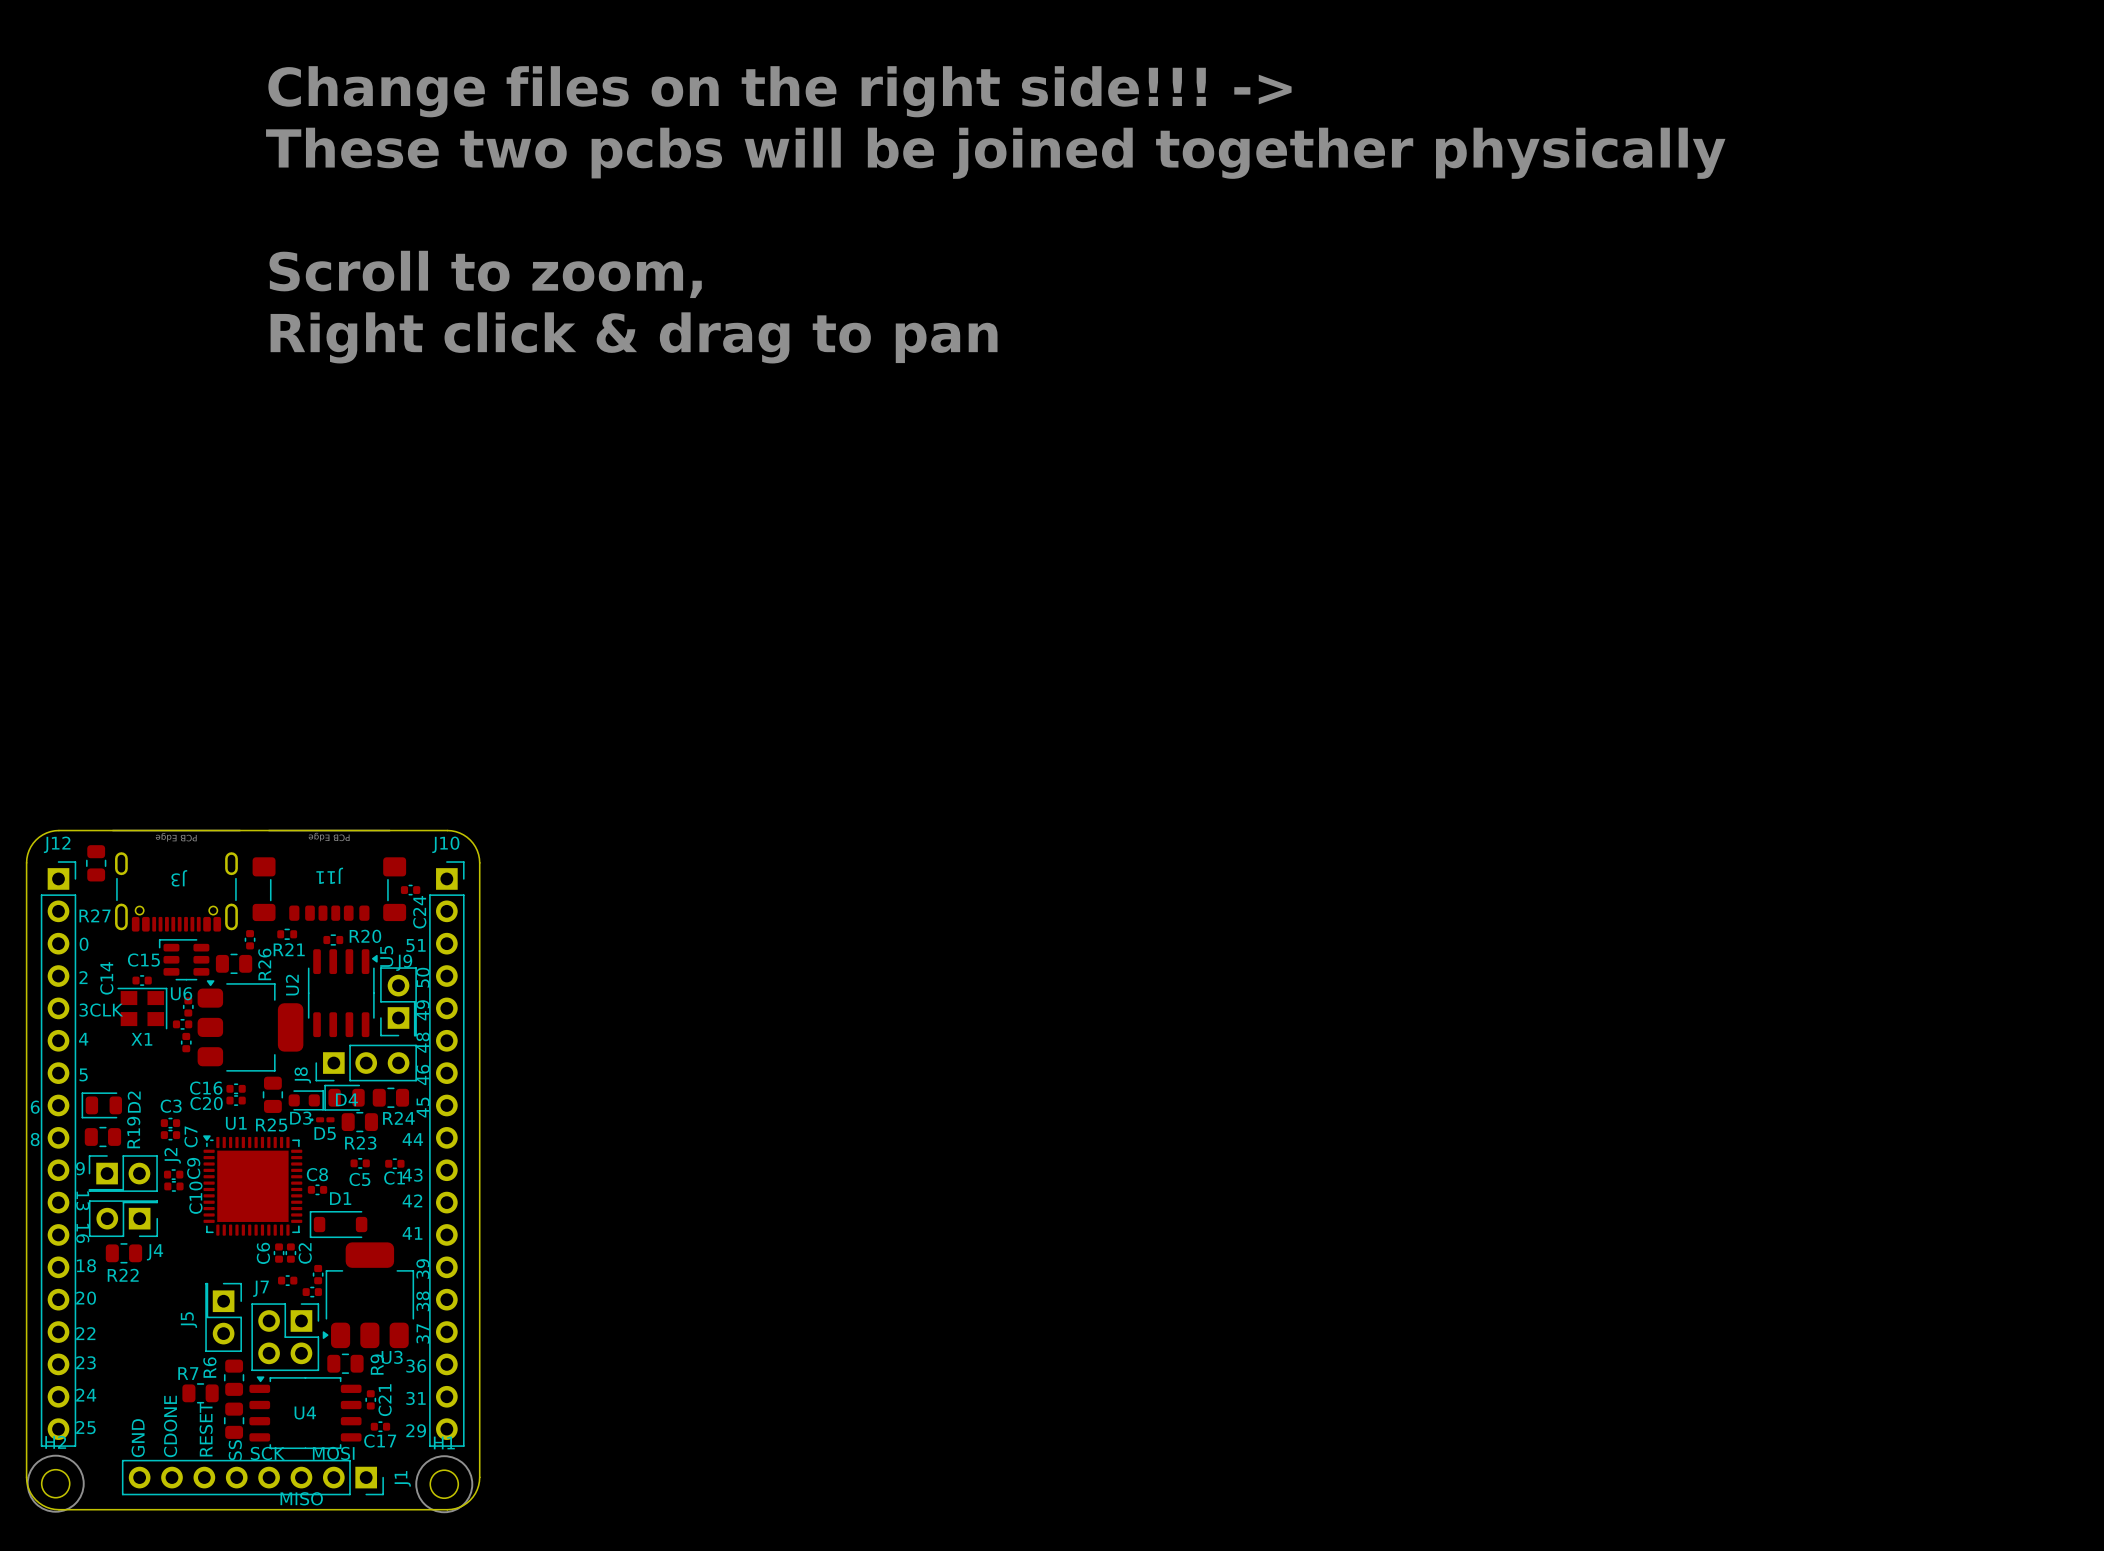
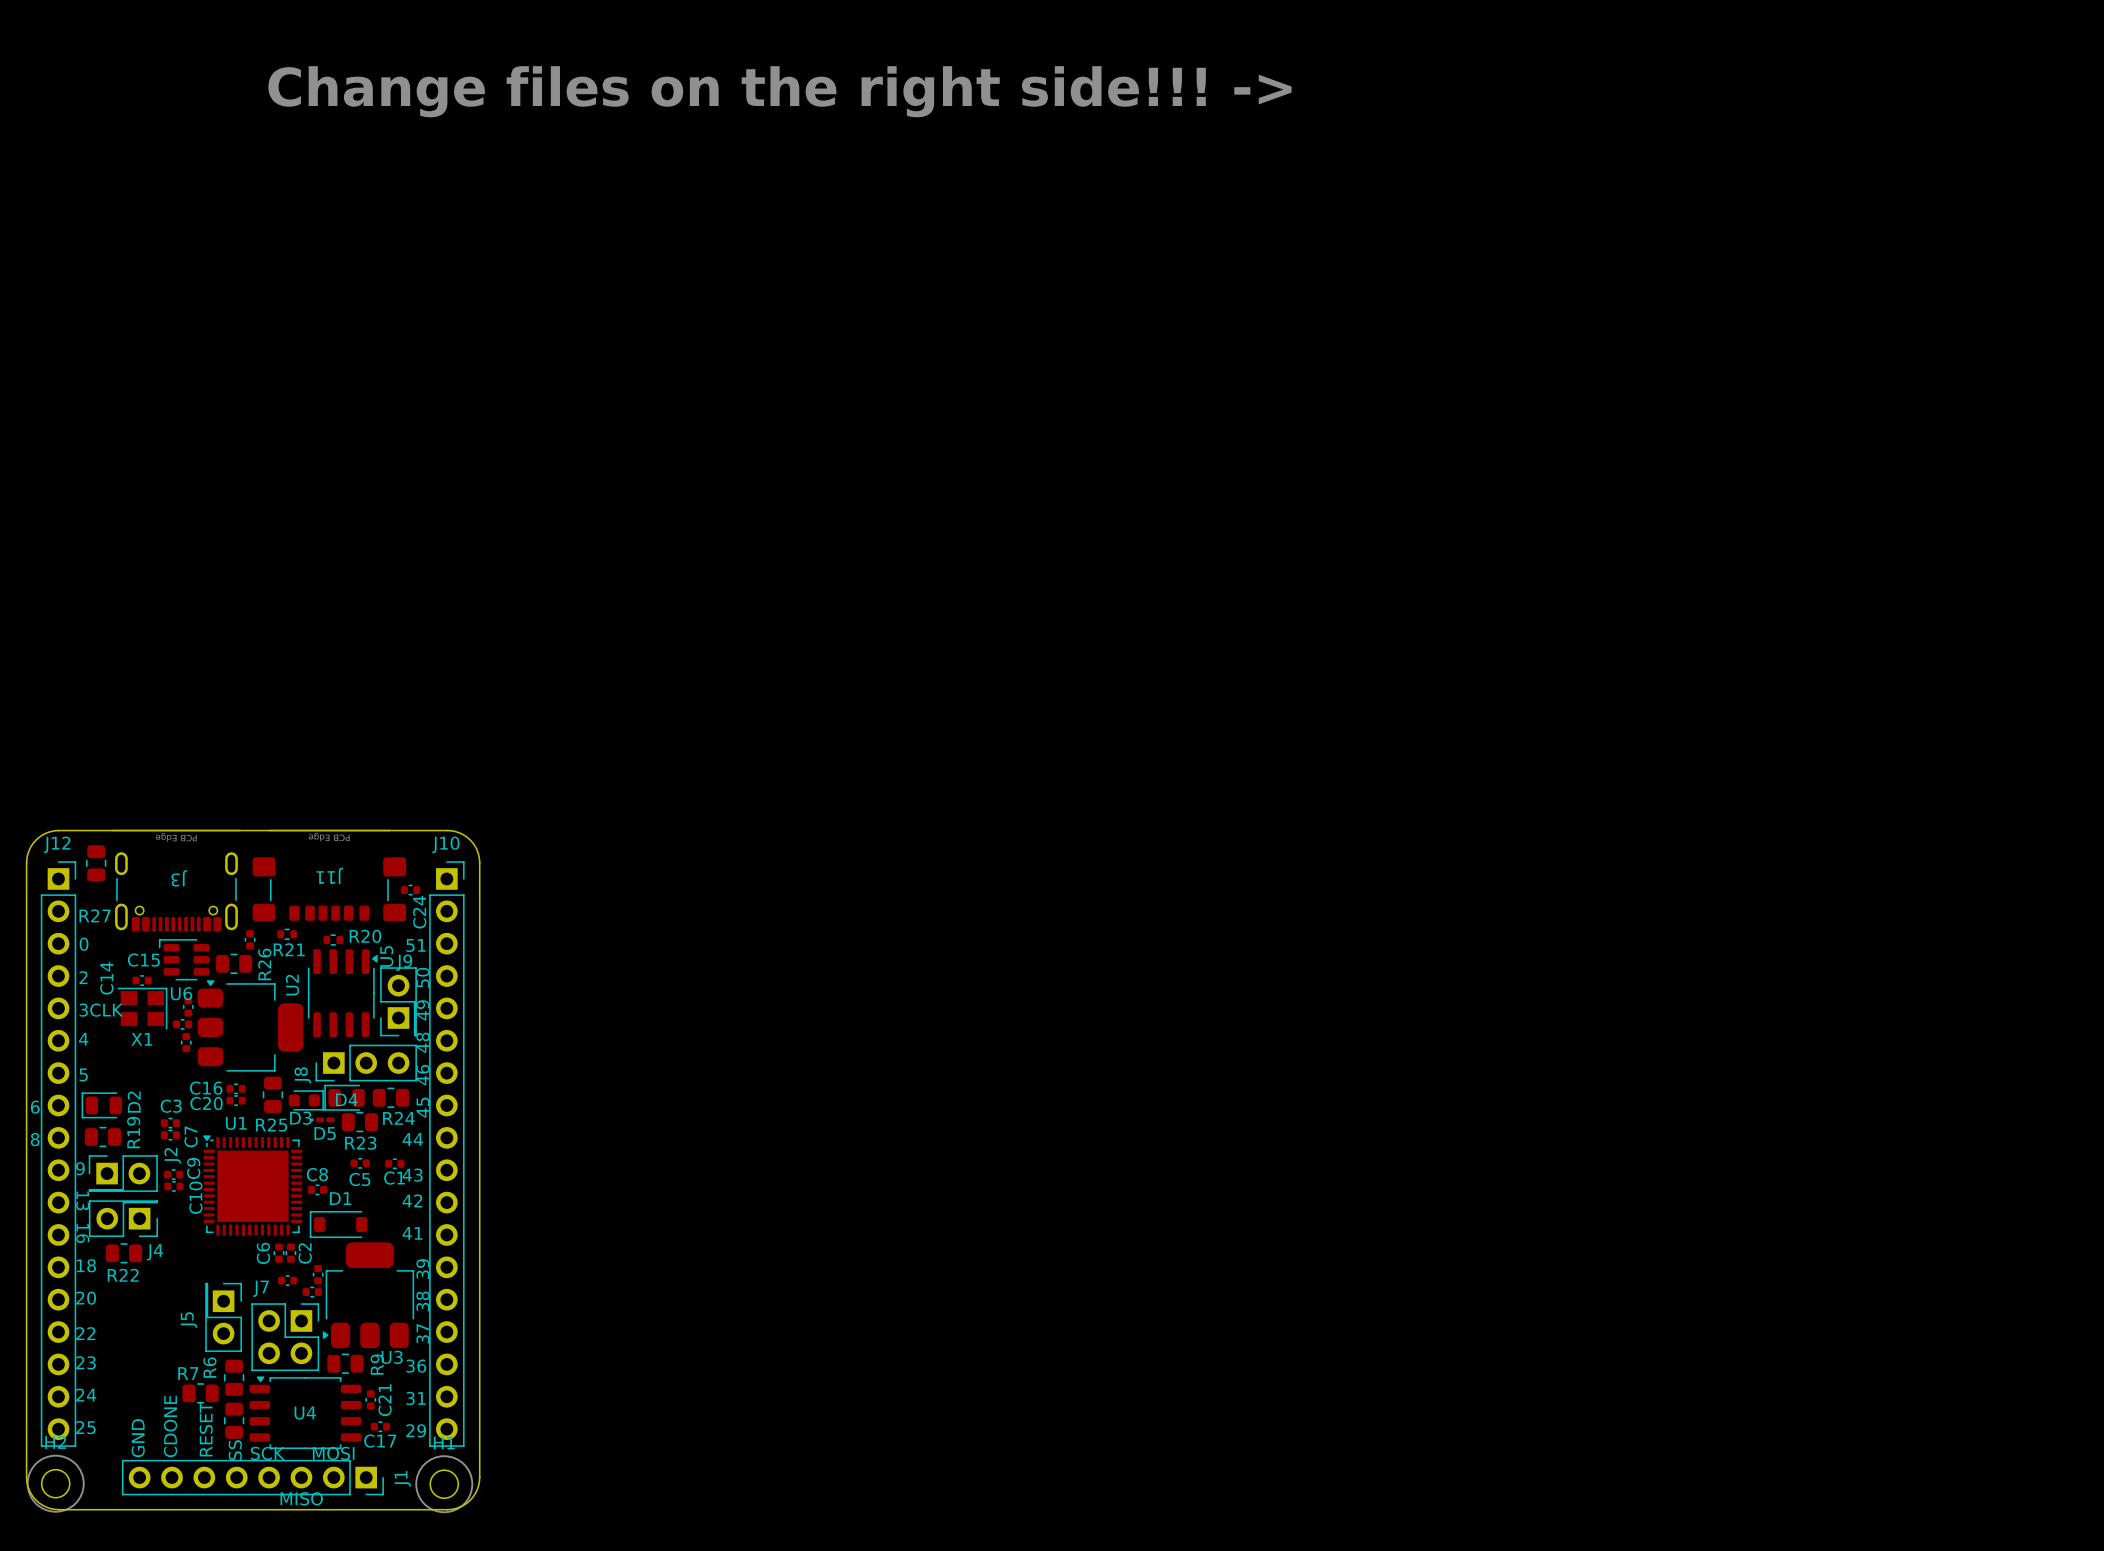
text: These two pcbs will be joined together physically (995, 153) -> none
text: Scroll to zoom, (485, 274) -> none
text: Right click & drag to pan (634, 337) -> none

